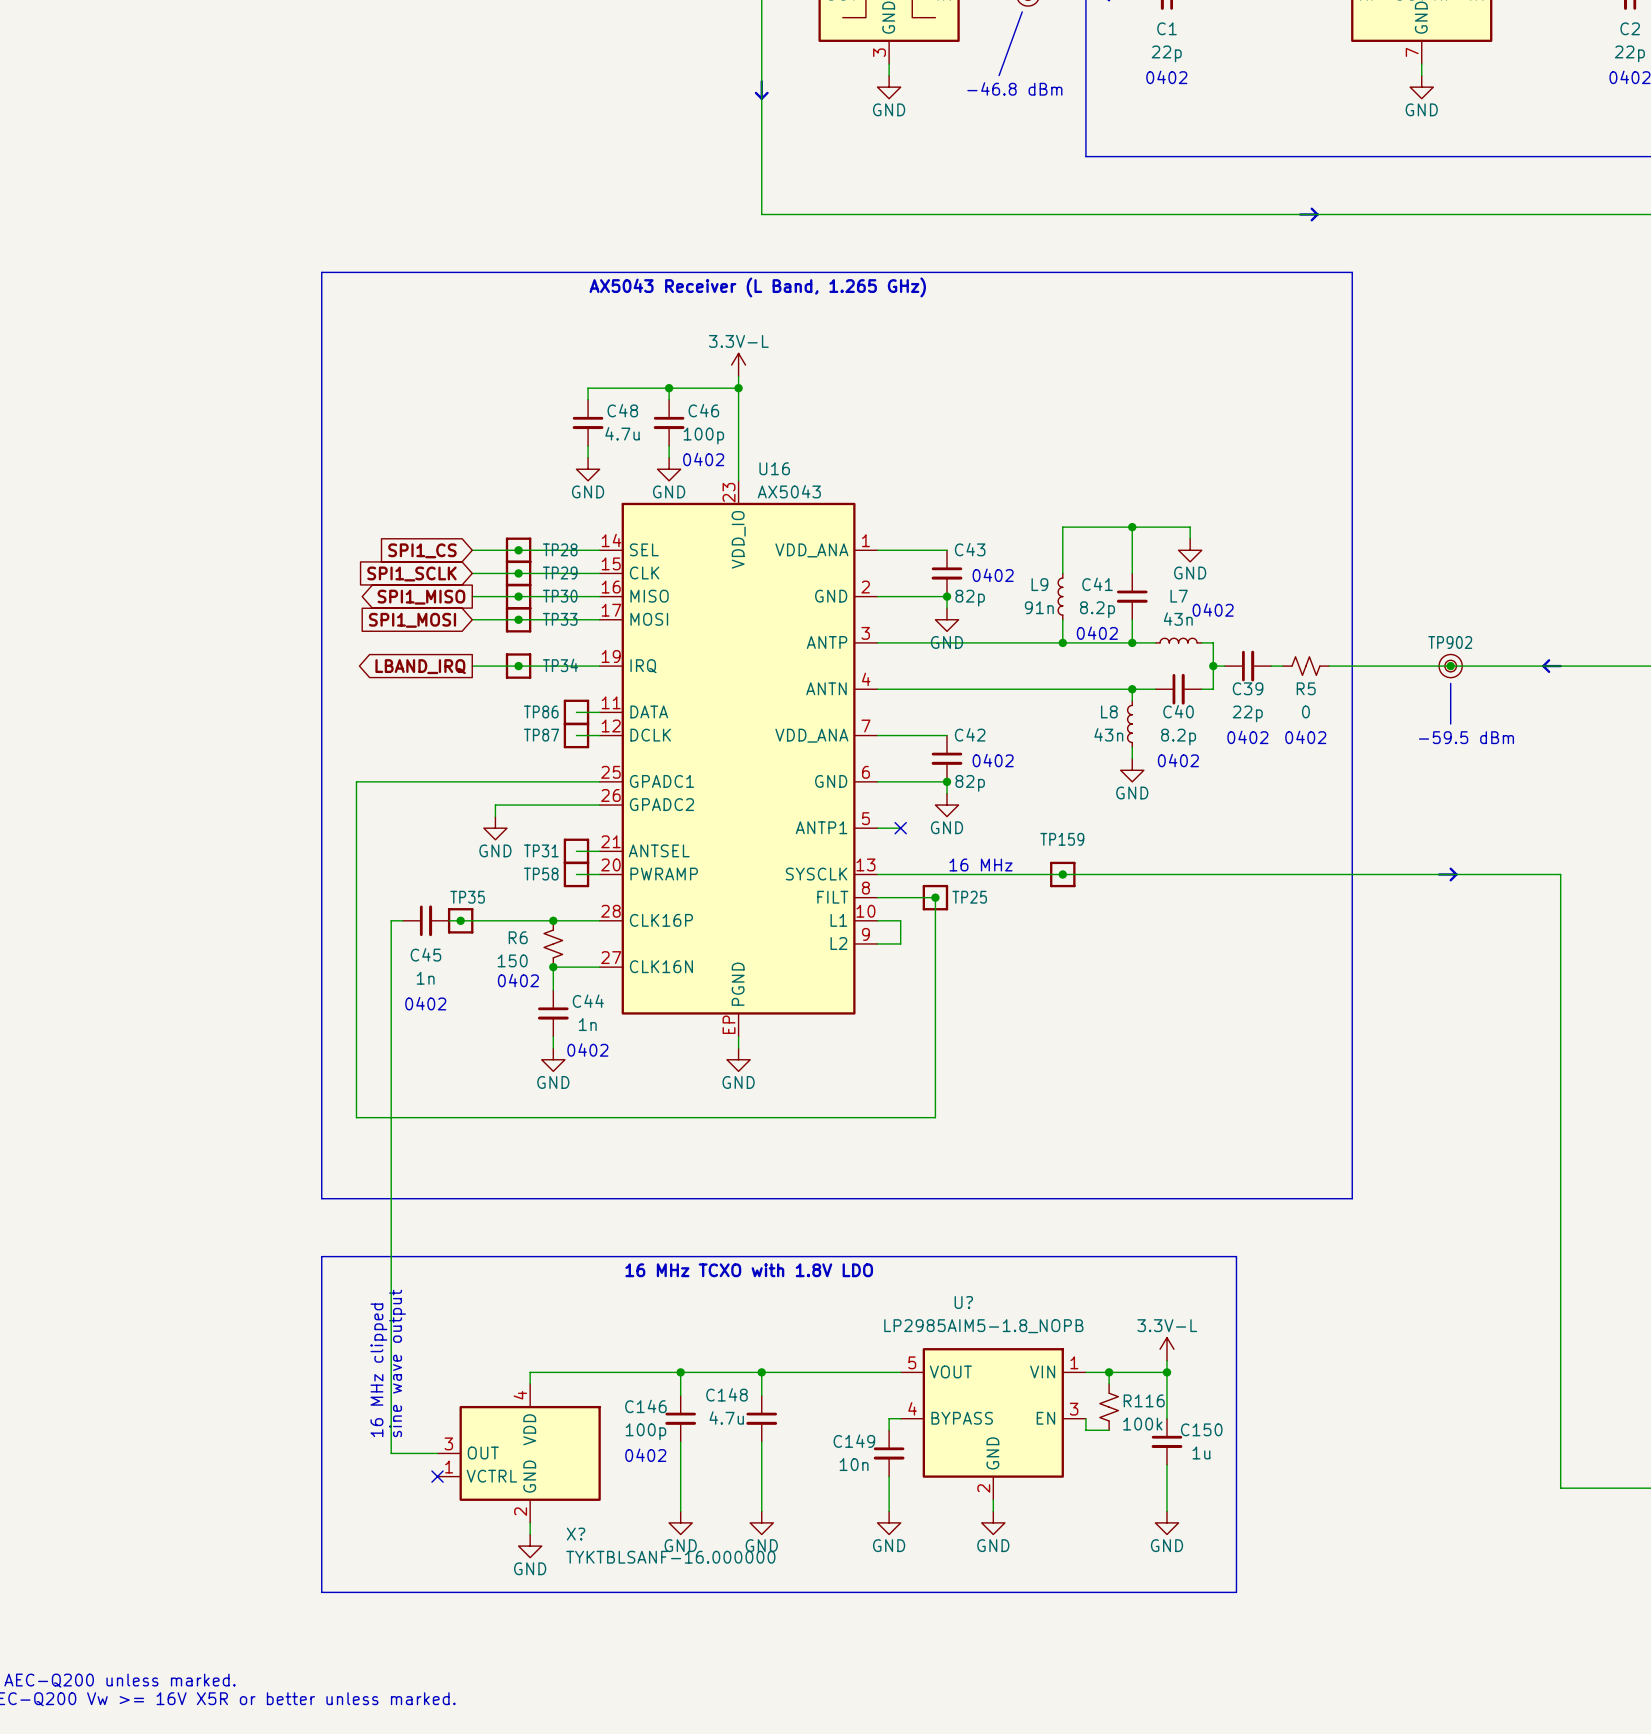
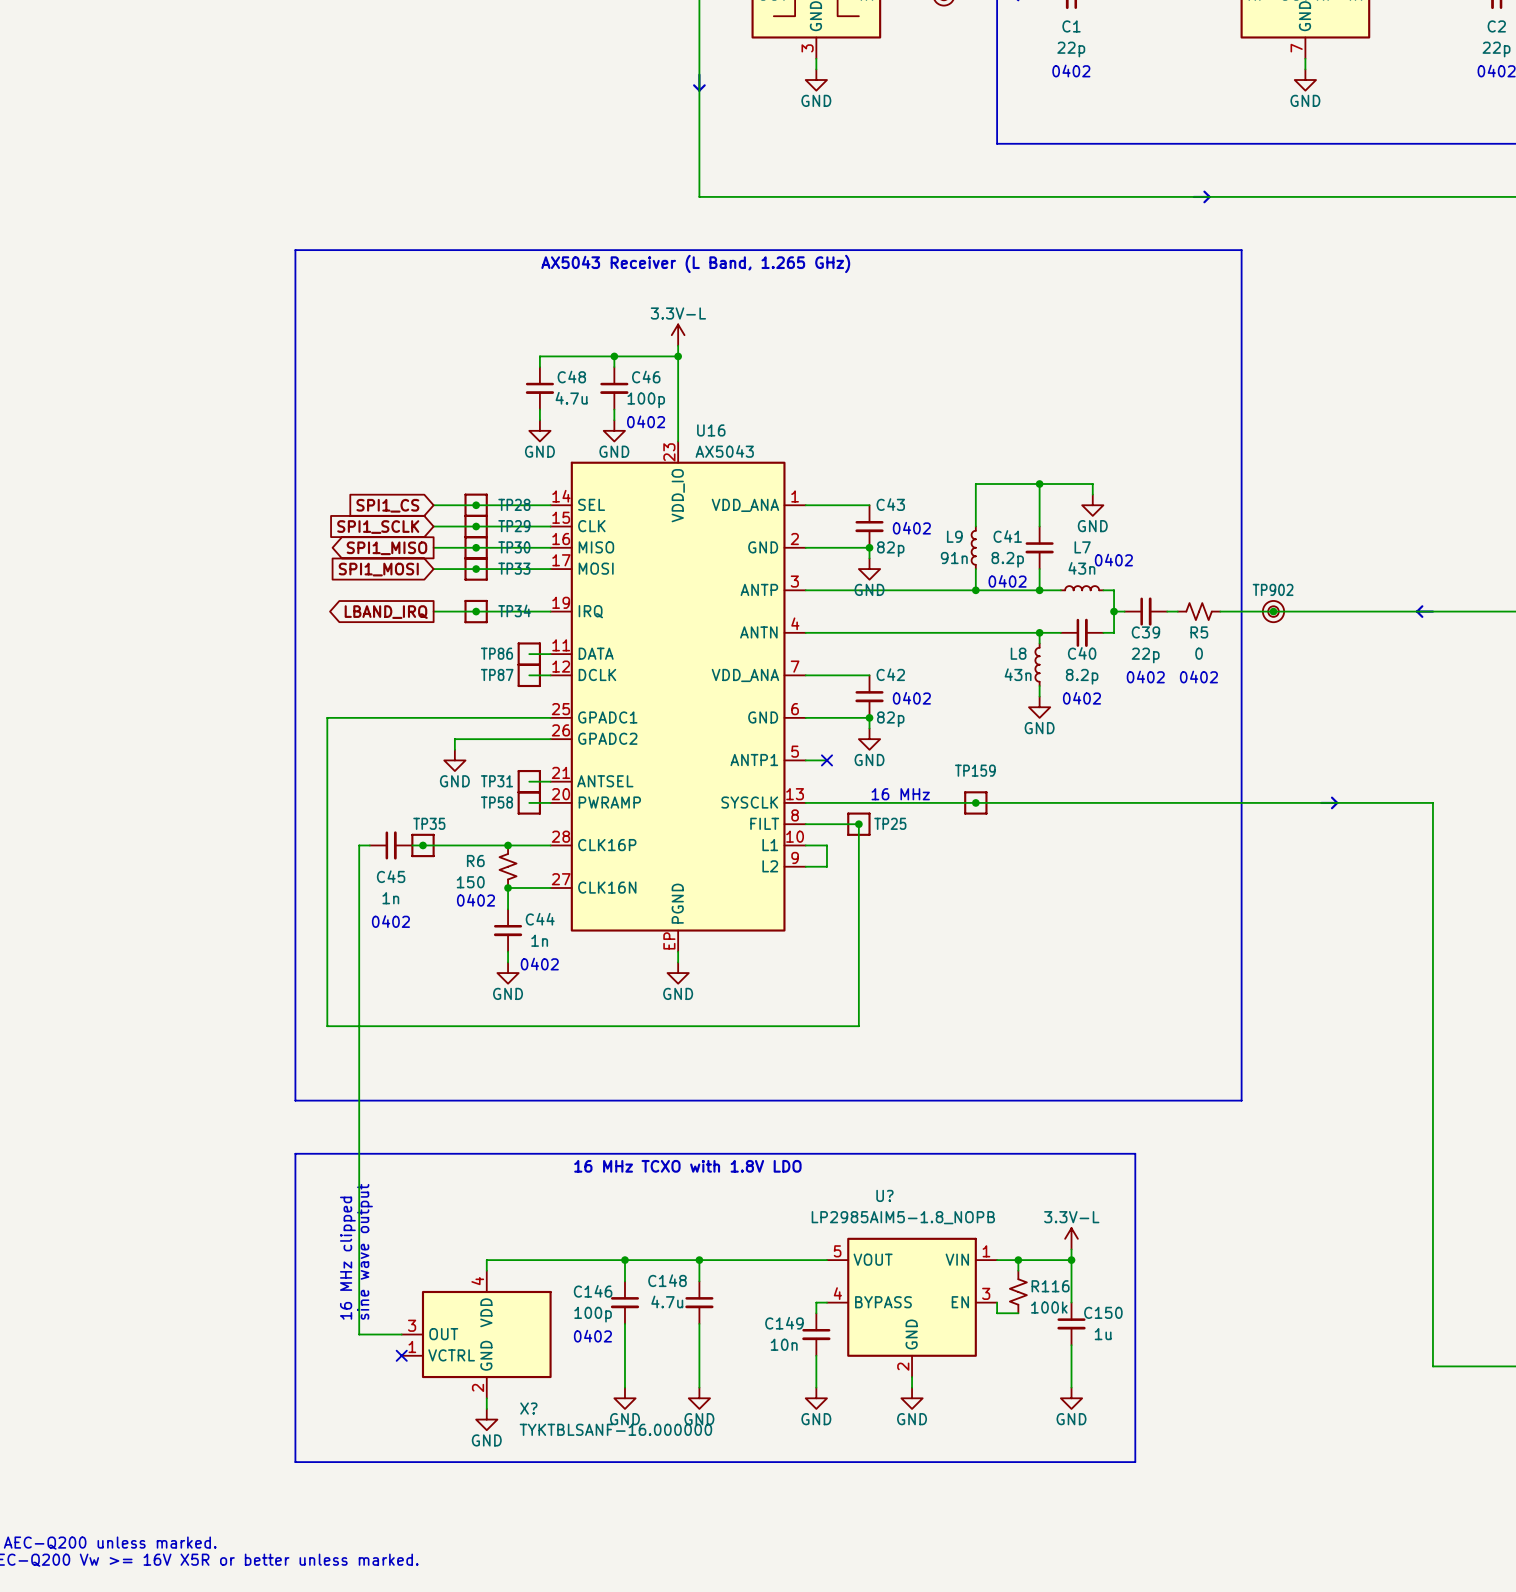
line: (1022, 11) (999, 75) -> none
text: -46.8 dBm (1014, 88) -> none
junction: none -> (1273, 611)
junction: (1450, 666) -> none
TP902 position: (1450, 666) -> (1273, 611)
line: (1450, 683) (1450, 723) -> none
text: -59.5 dBm (1466, 737) -> none

